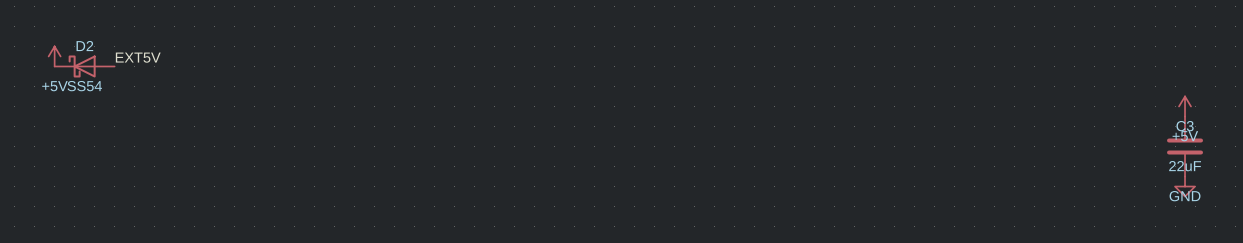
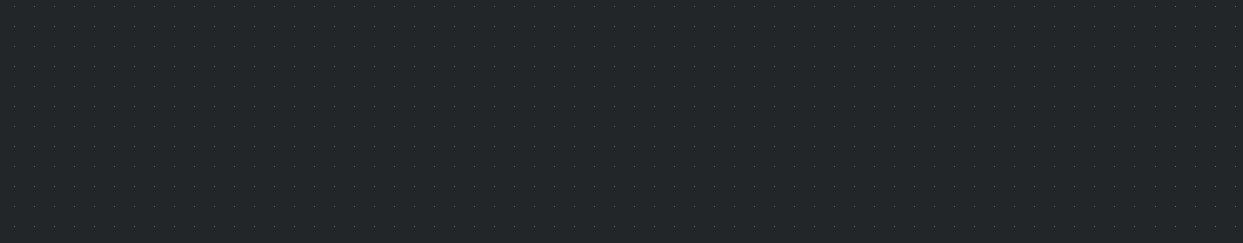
power symbol: +5V (54, 56) -> none
label: EXT5V (138, 57) -> none
D2: SS54 (84, 66) -> none
power symbol: +5V (1185, 106) -> none
C3: 22uF (1185, 146) -> none
power symbol: GND (1185, 186) -> none

